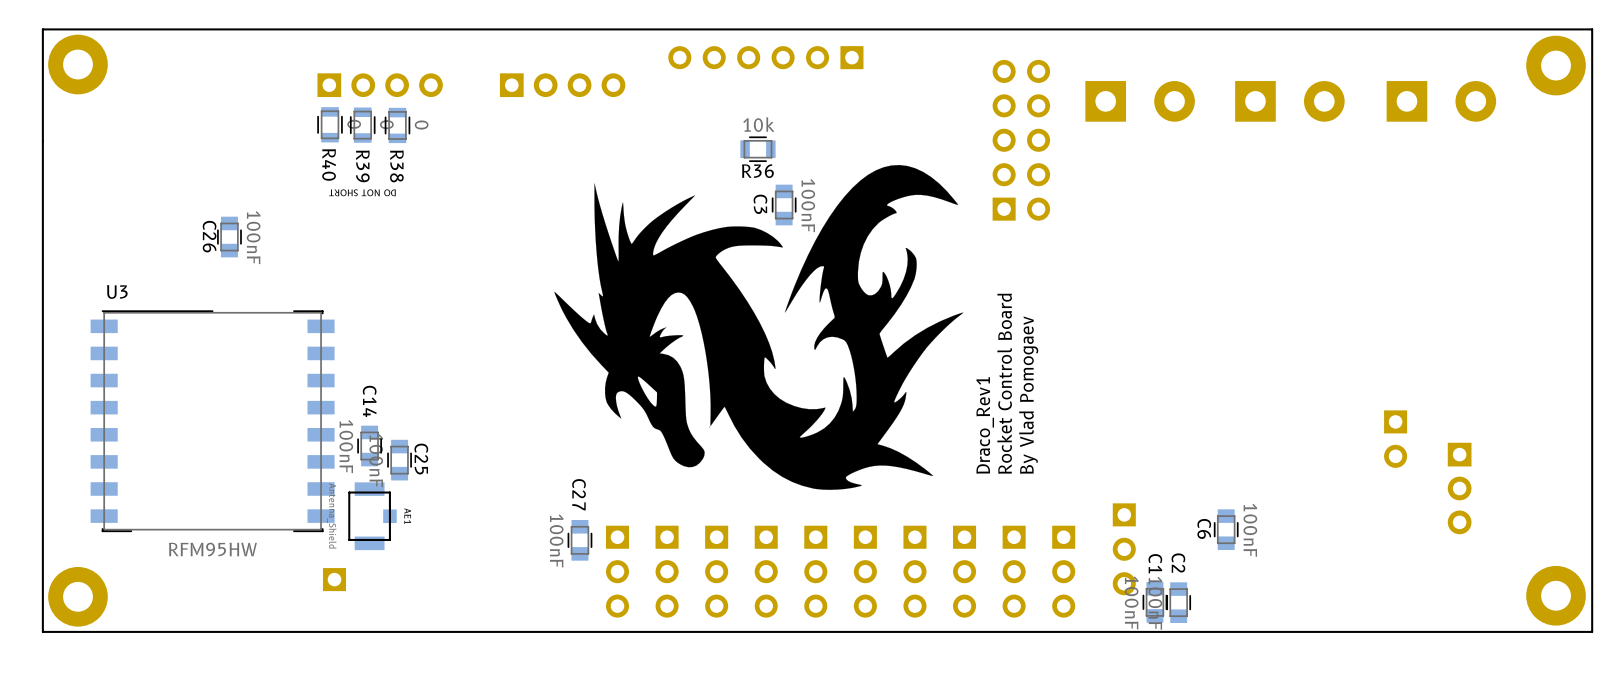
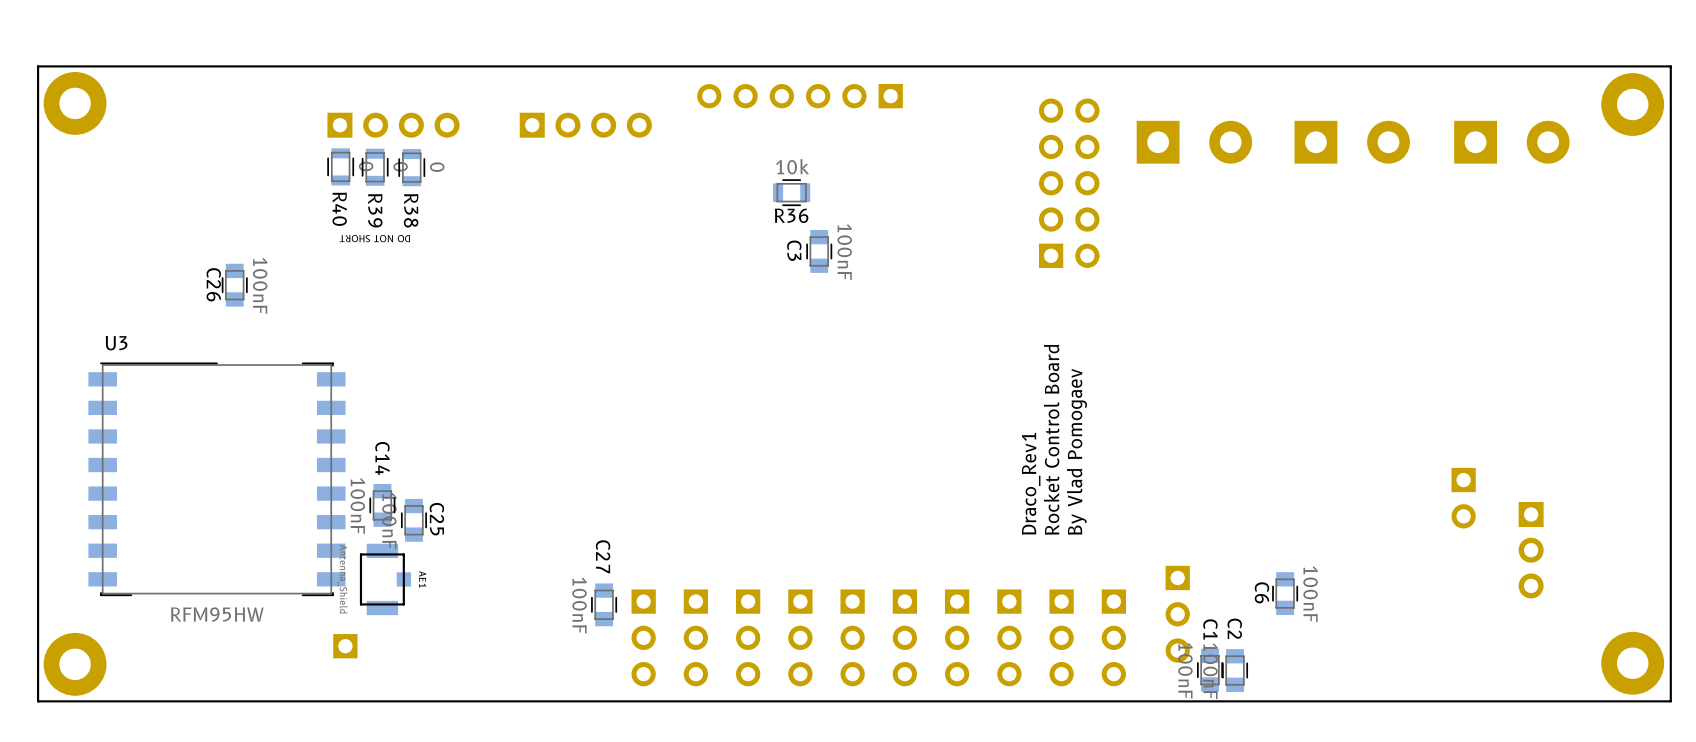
drawing: [554, 165, 964, 490] -> none

